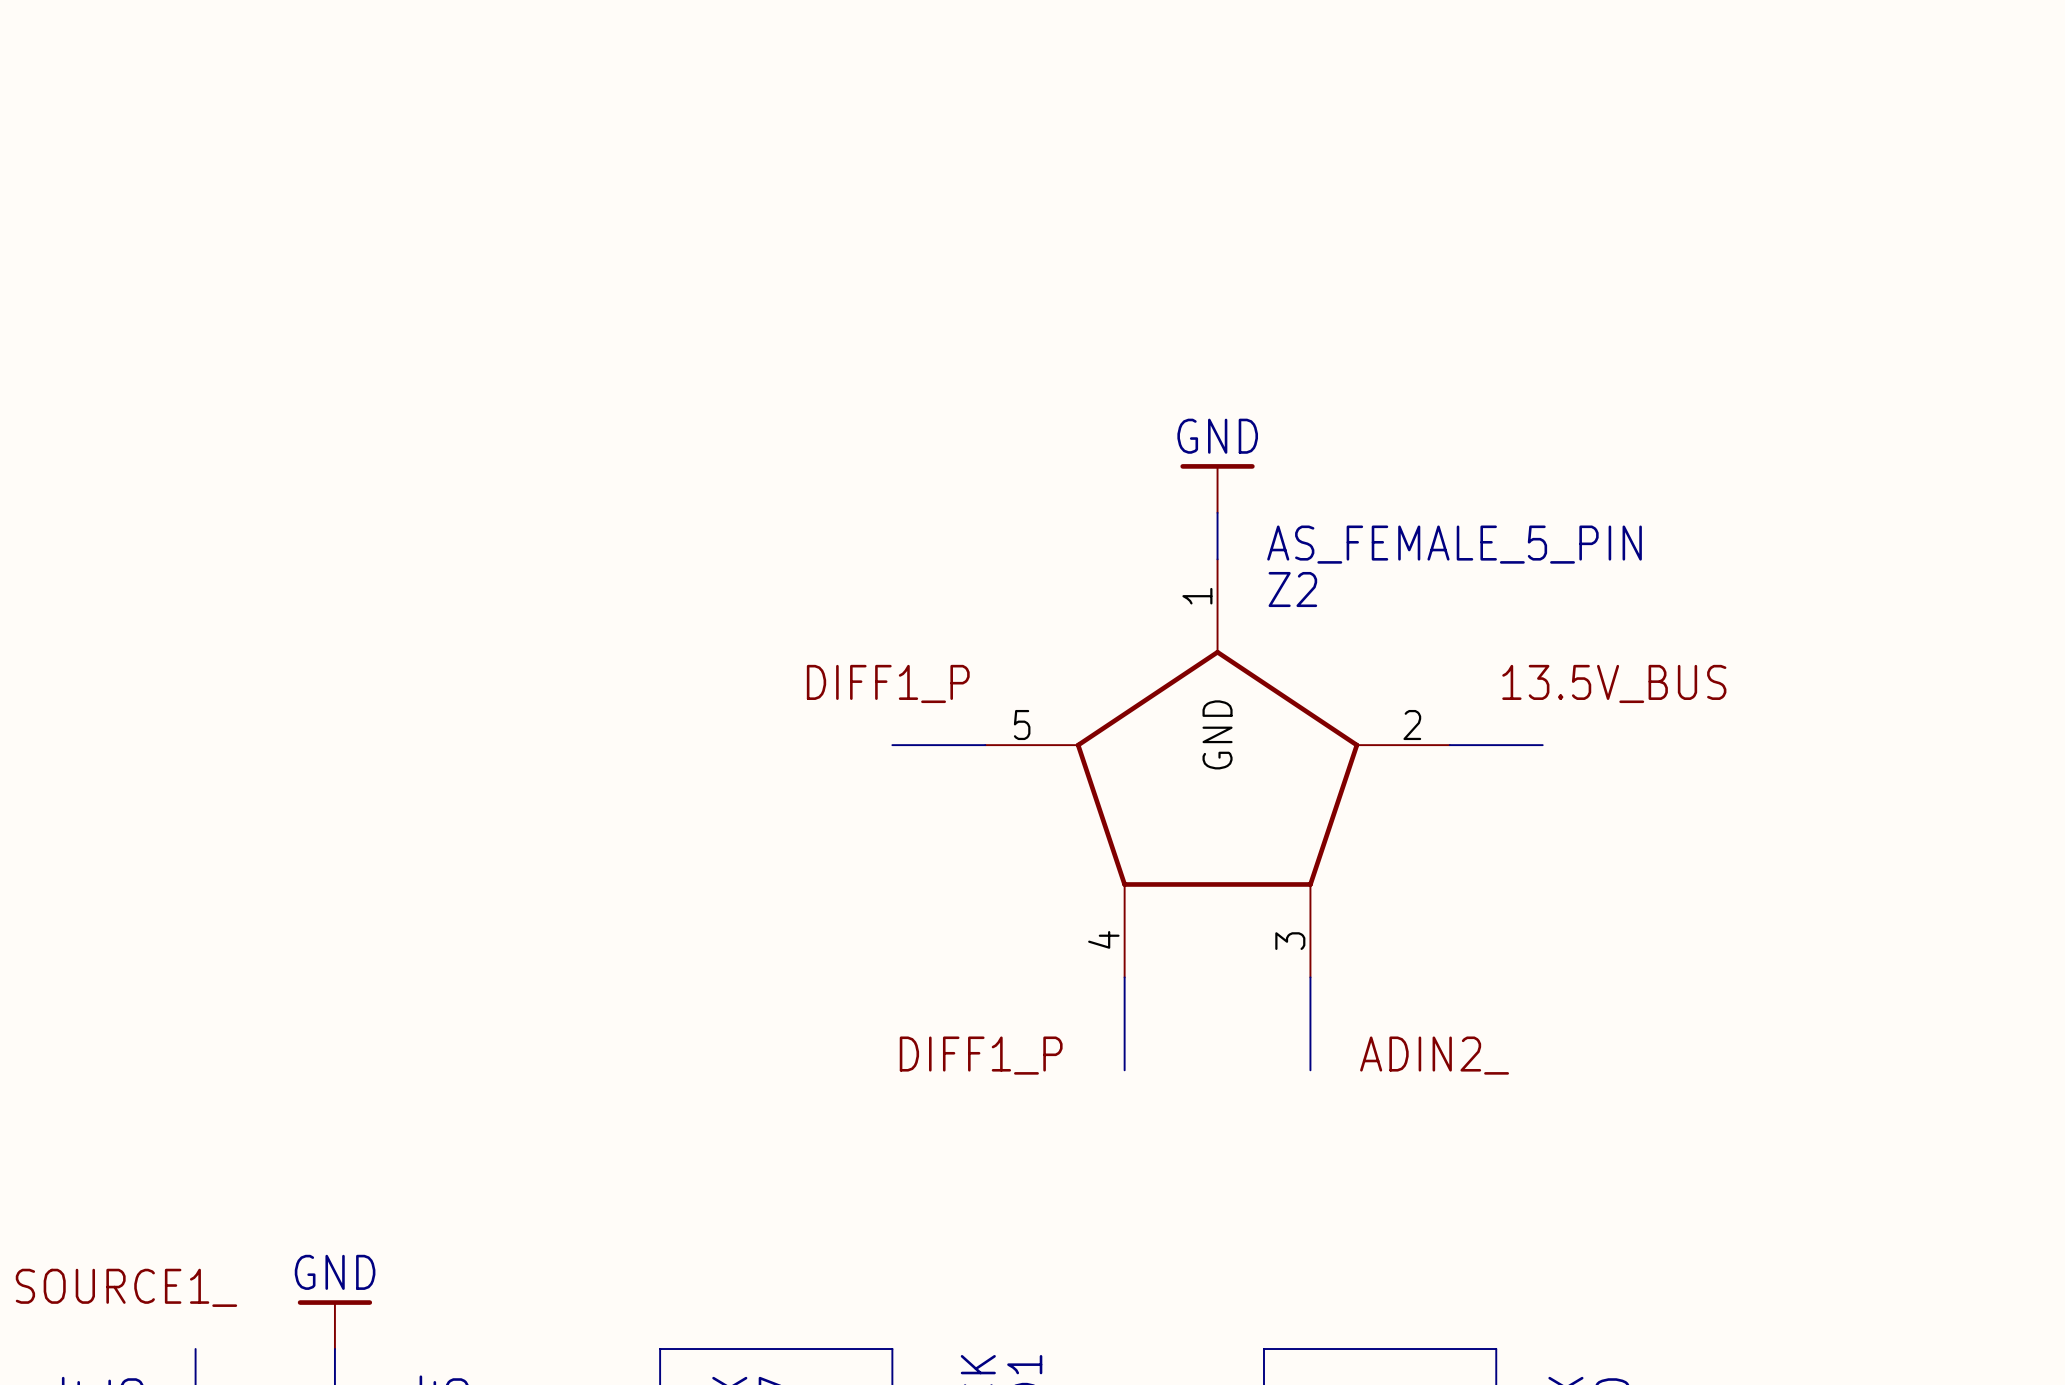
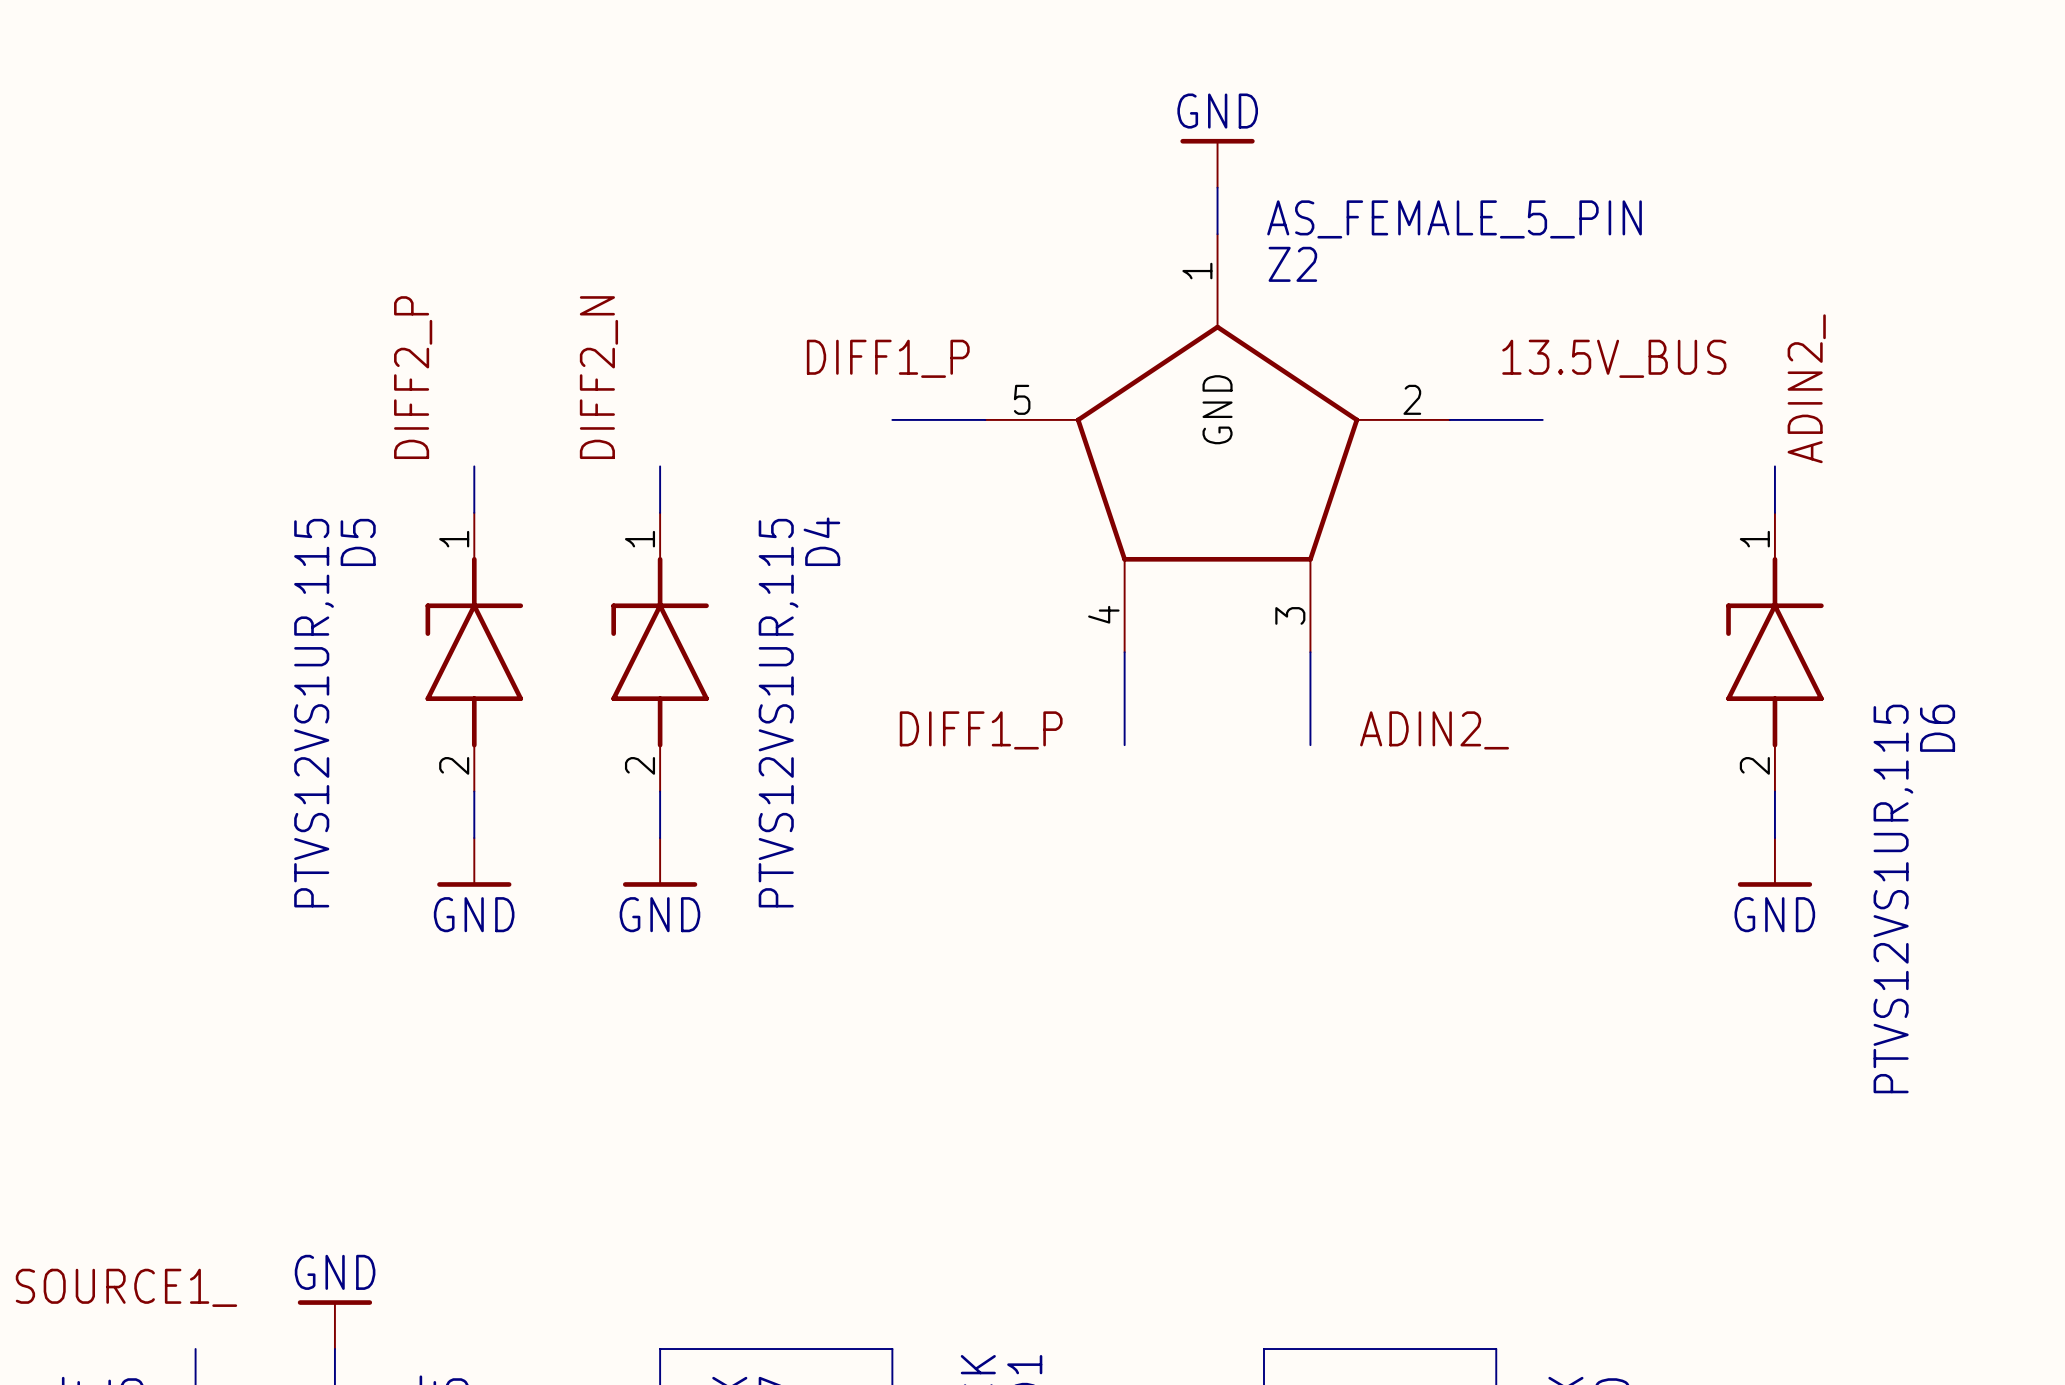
label: none -> DIFF1_P (888, 358)
label: none -> DIFF2_P (413, 377)
label: none -> DIFF2_N (598, 377)
label: none -> ADIN2_ (1806, 388)
wire: none -> (474, 466) (474, 512)
wire: none -> (660, 466) (660, 512)
wire: none -> (1774, 466) (1774, 512)
power symbol position: GND (1217, 488) -> GND (1217, 163)
wire: (1217, 512) (1217, 559) -> (1217, 187) (1217, 234)
D5: none -> PTVS12VS1UR,115 (474, 652)
D4: none -> PTVS12VS1UR,115 (660, 652)
D6: none -> PTVS12VS1UR,115 (1774, 652)
label position: DIFF1_P (888, 683) -> DIFF1_P (981, 730)
label position: 13.5V_BUS (1614, 683) -> 13.5V_BUS (1614, 358)
wire: (892, 745) (985, 745) -> (892, 419) (985, 419)
wire: (1449, 745) (1542, 745) -> (1449, 419) (1542, 419)
Z2 position: (1217, 768) -> (1217, 443)
wire: none -> (474, 791) (474, 838)
wire: none -> (660, 791) (660, 838)
wire: none -> (1774, 791) (1774, 838)
power symbol: none -> GND (474, 862)
power symbol: none -> GND (660, 862)
power symbol: none -> GND (1774, 862)
wire: (1124, 977) (1124, 1070) -> (1124, 652) (1124, 745)
wire: (1310, 977) (1310, 1070) -> (1310, 652) (1310, 745)
label: DIFF1_P (981, 1055) -> none
label position: ADIN2_ (1434, 1055) -> ADIN2_ (1434, 730)

